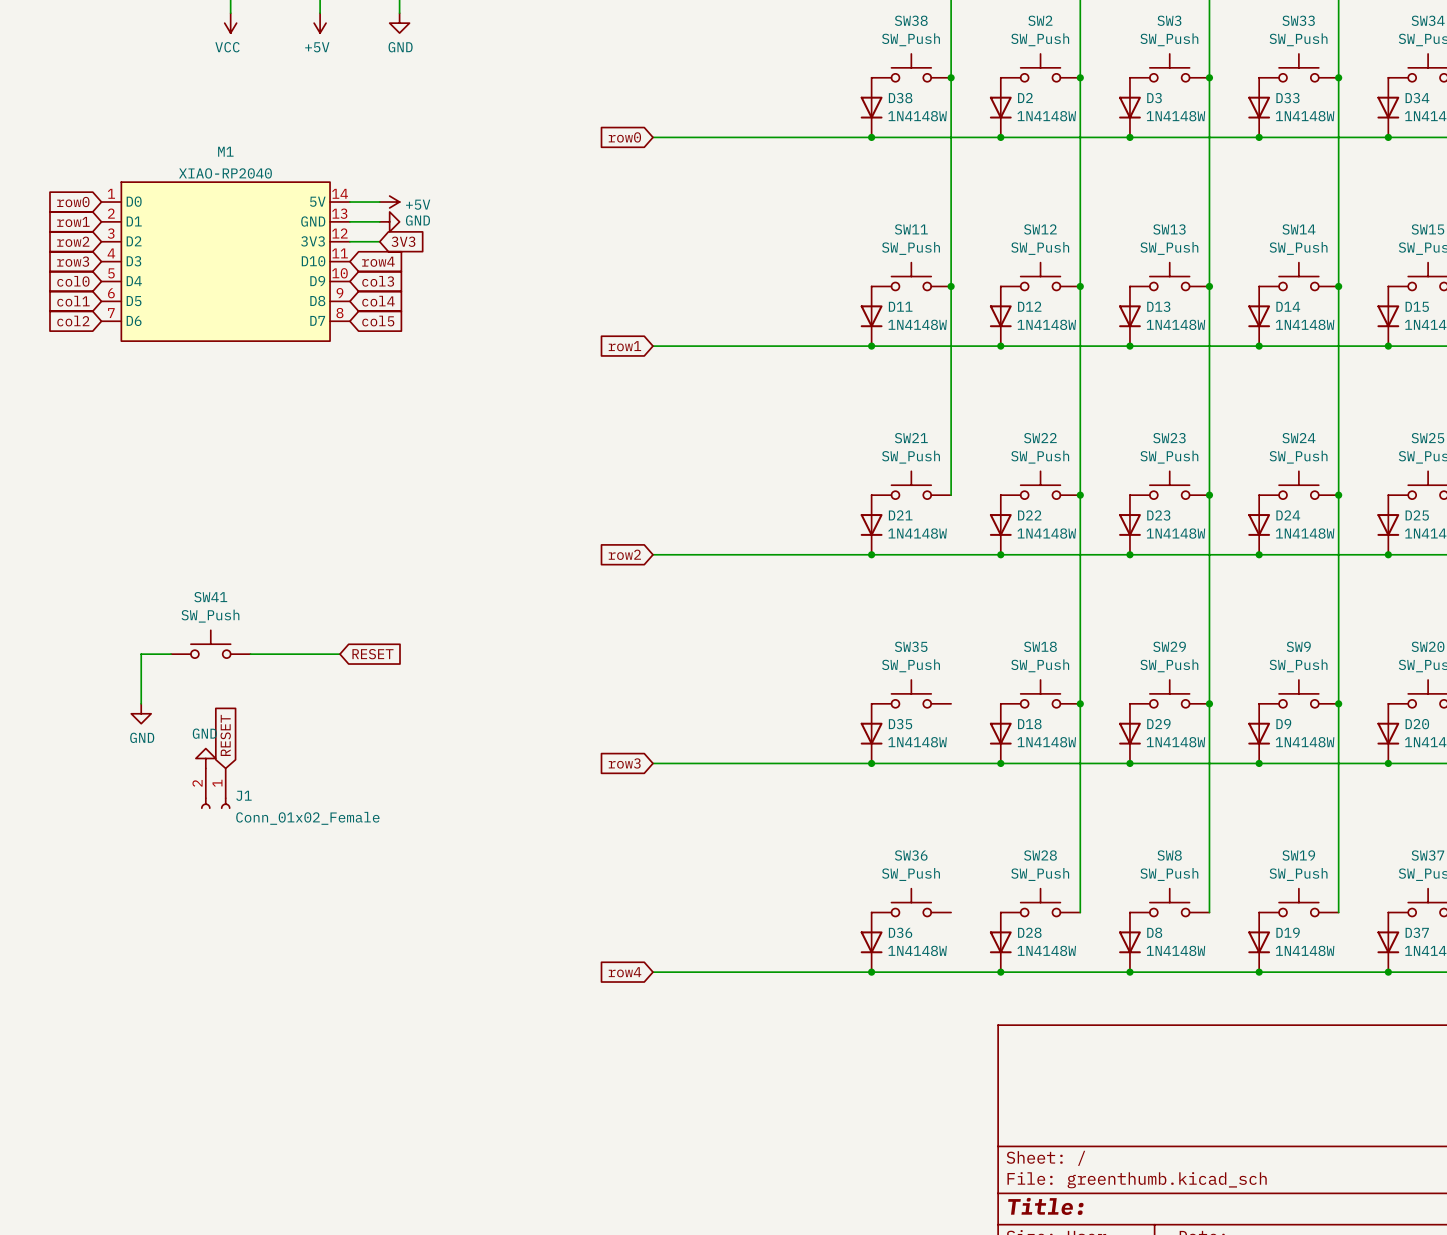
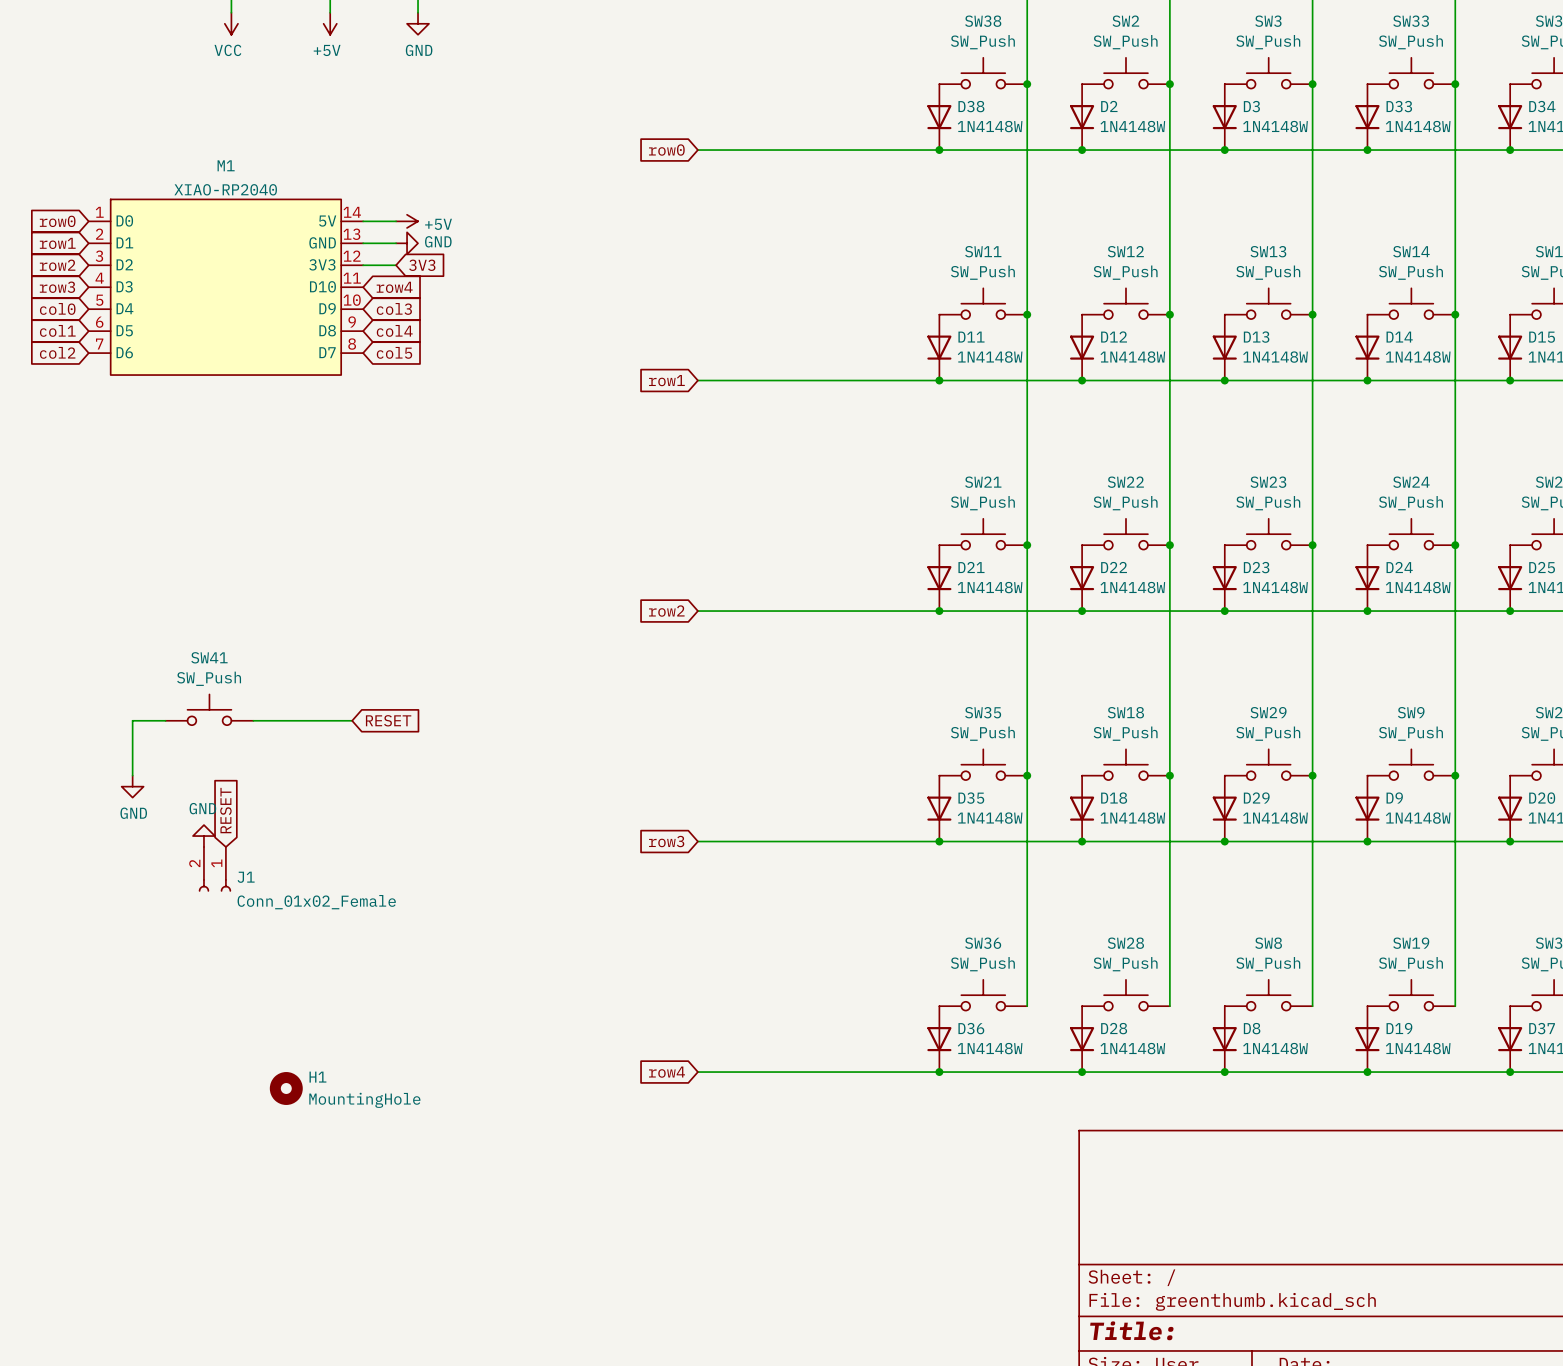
wire: none -> (1027, 545) (1027, 1006)
junction: none -> (1027, 545)
junction: none -> (1027, 775)
H1: none -> MountingHole (286, 1088)

